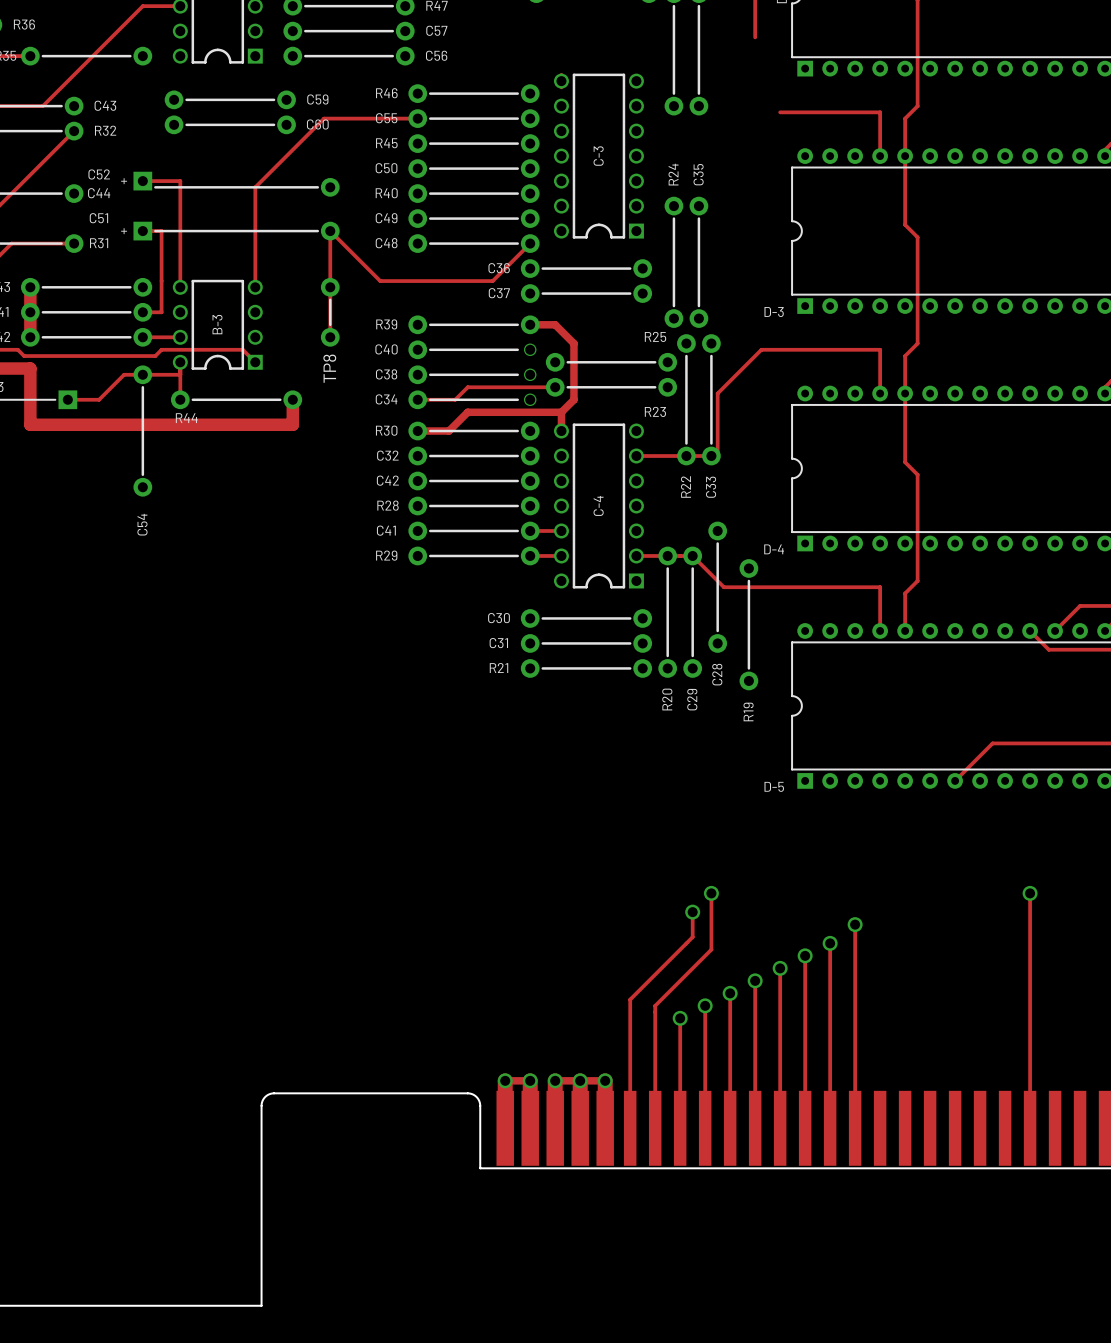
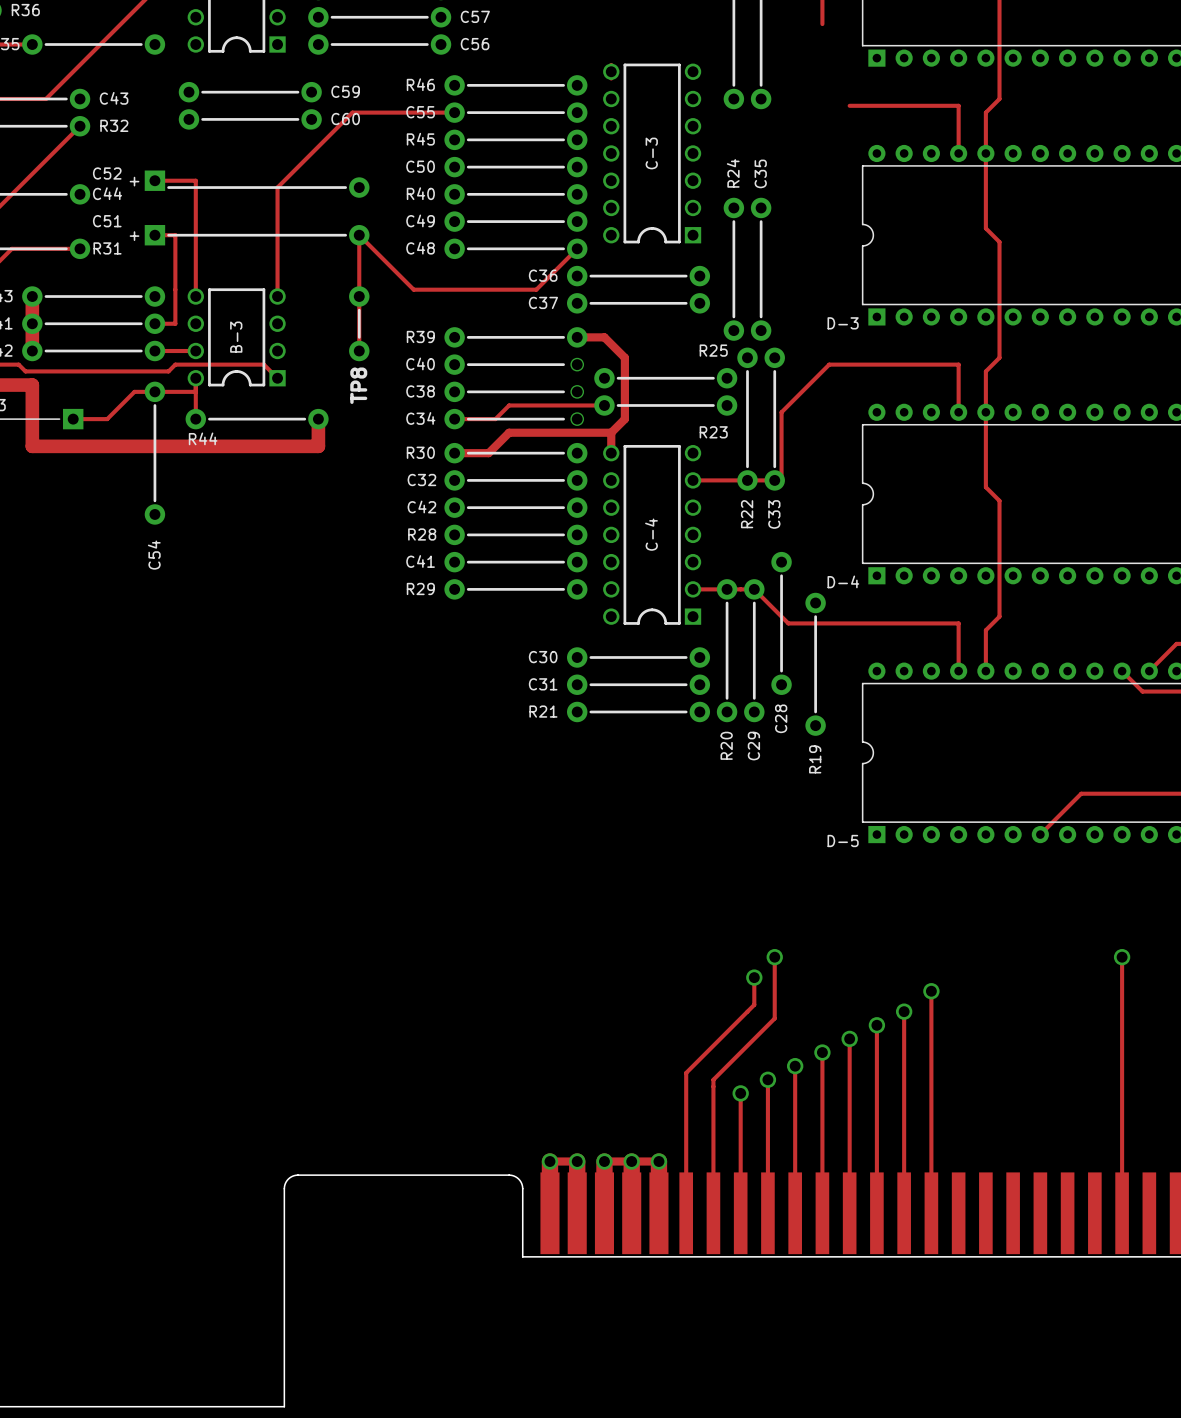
track: (530, 530) (561, 530) -> none
track: (530, 555) (561, 555) -> none

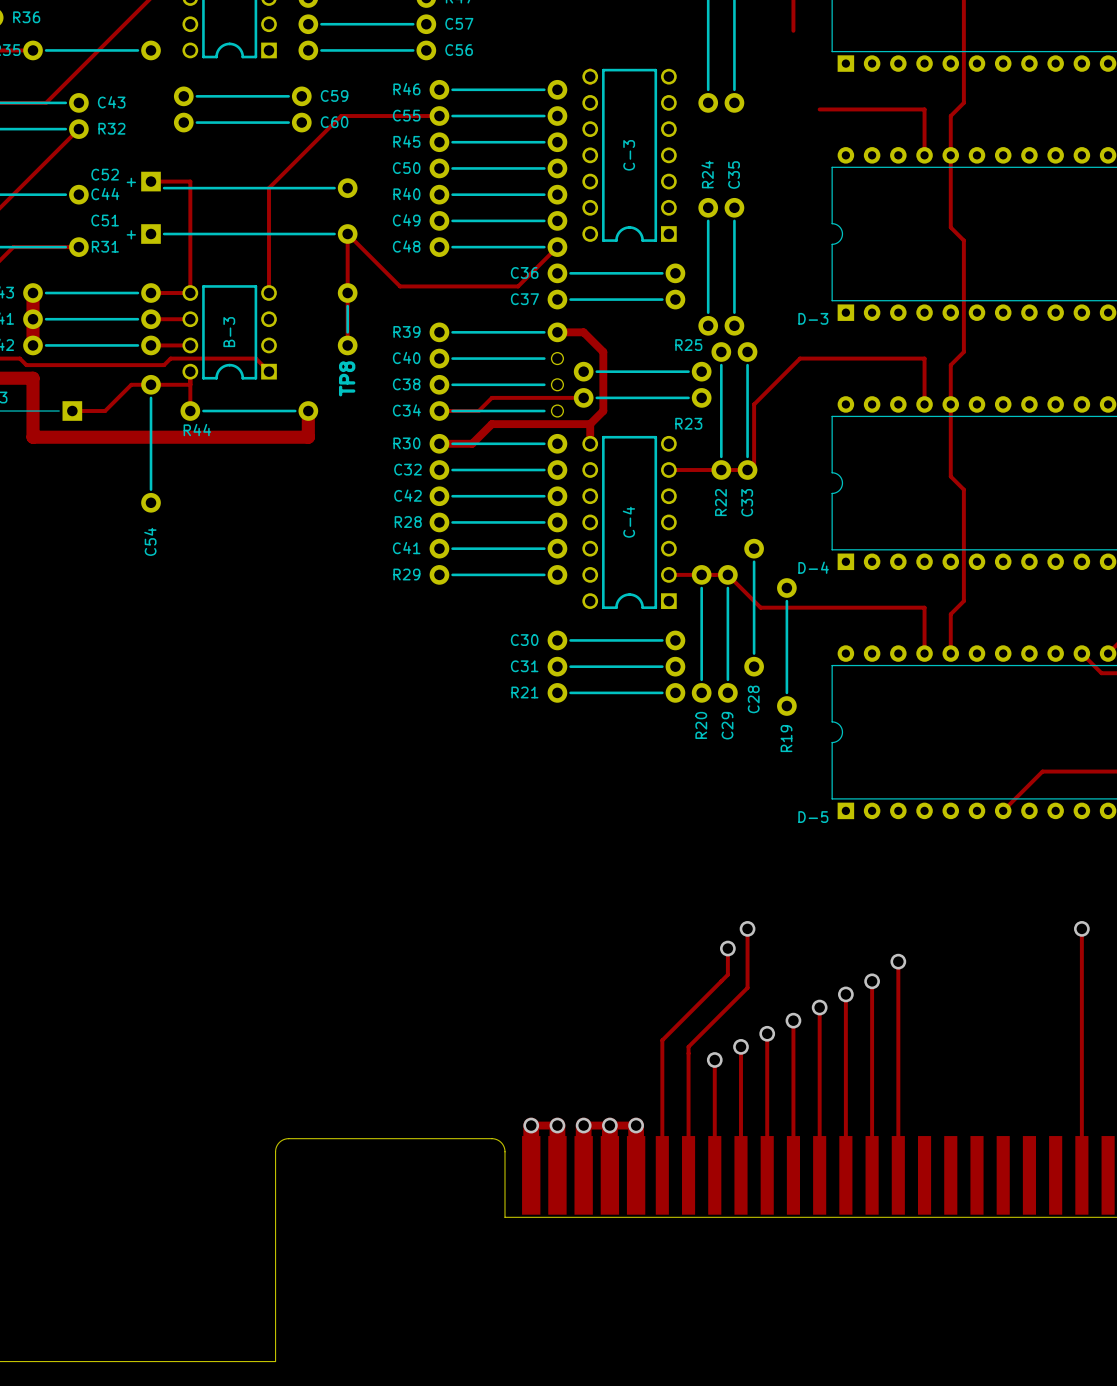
track: (154, 235) (175, 235) (175, 323) -> (190, 319) (170, 319)
track: none -> (151, 293) (190, 293)

